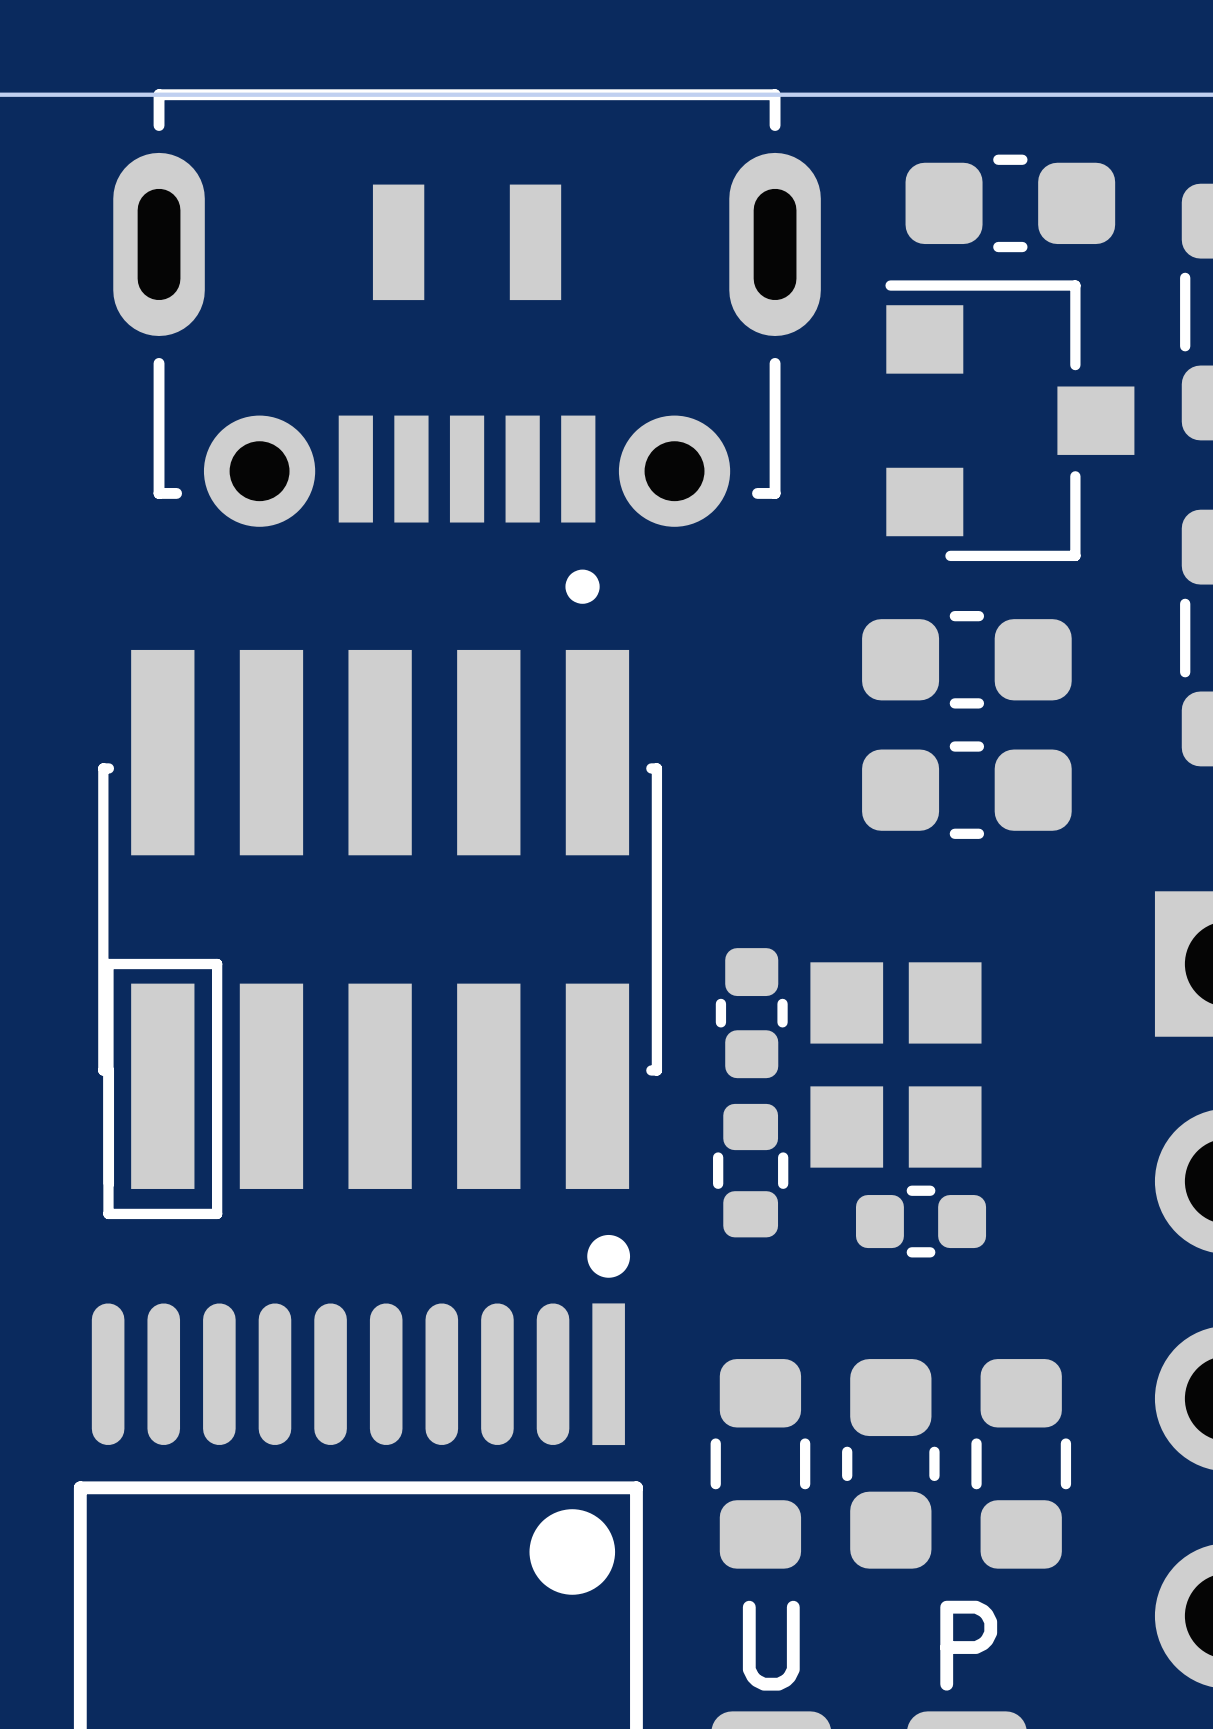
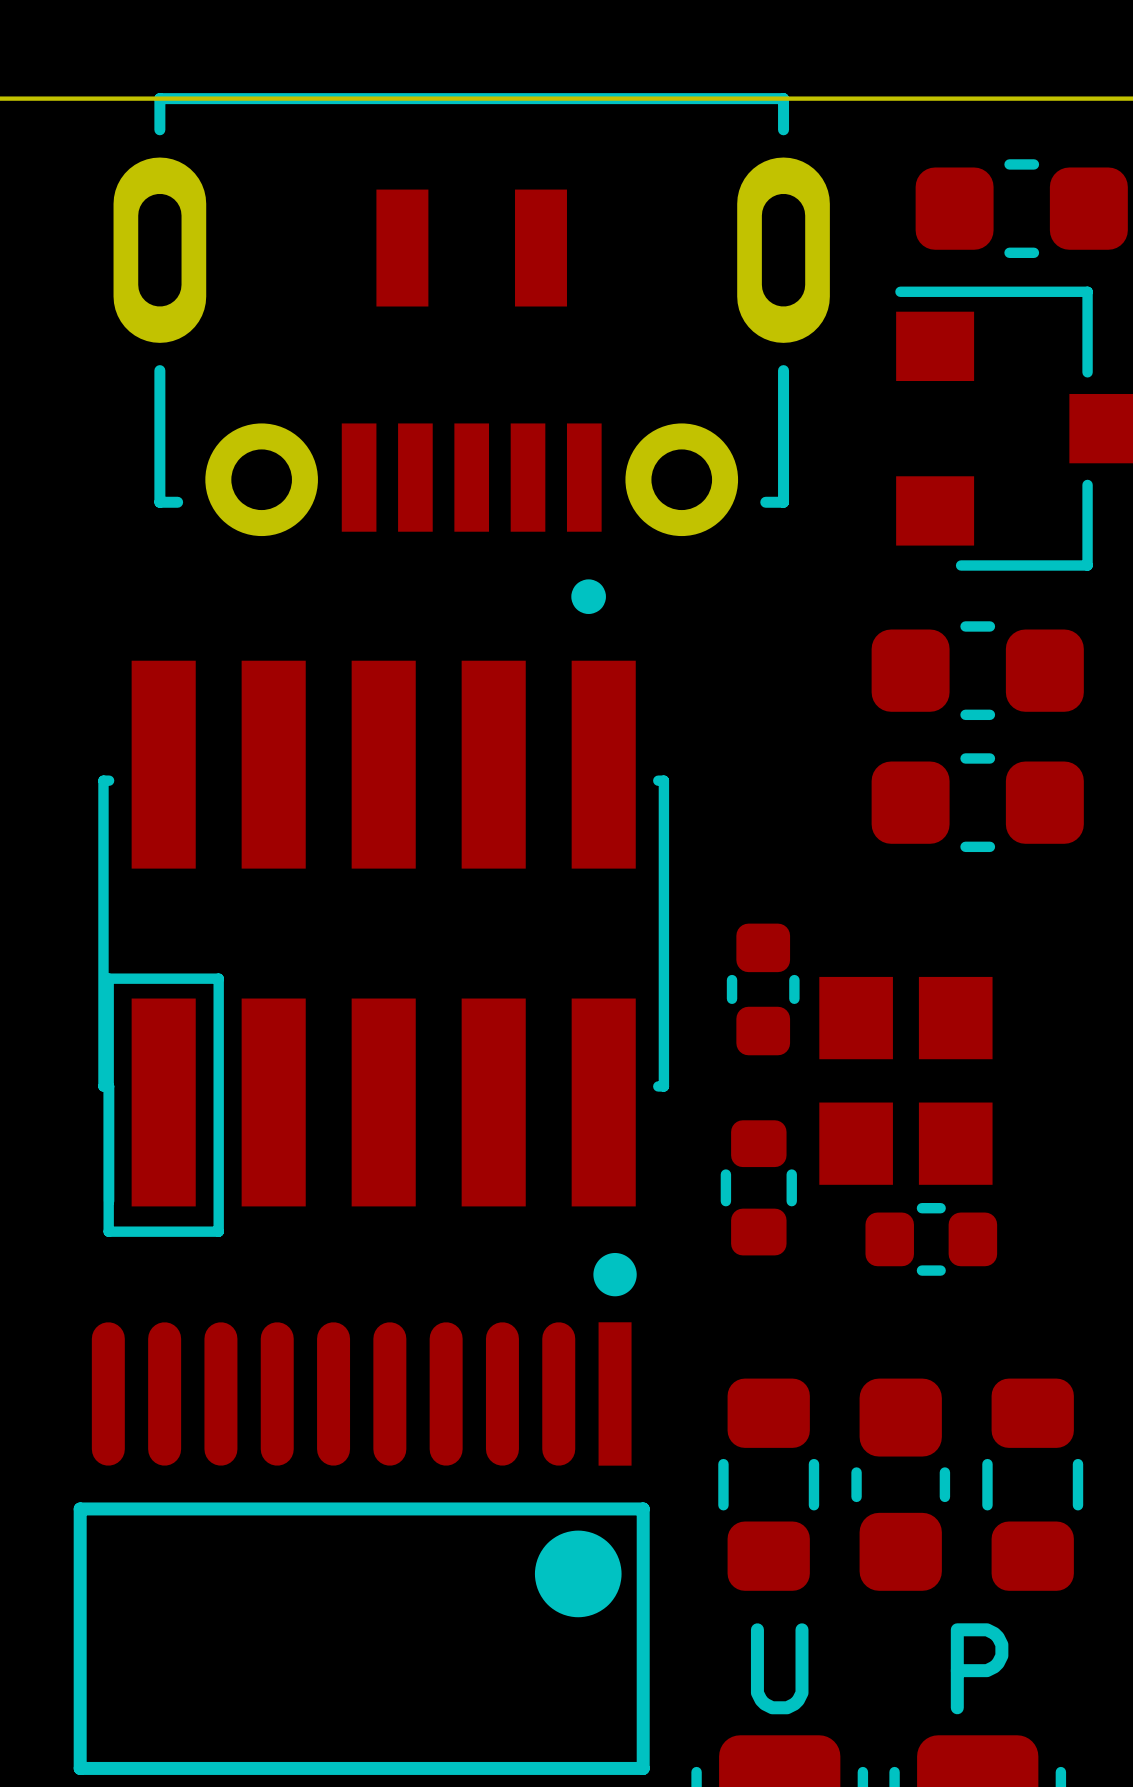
part position: (751, 1013) -> (763, 989)

